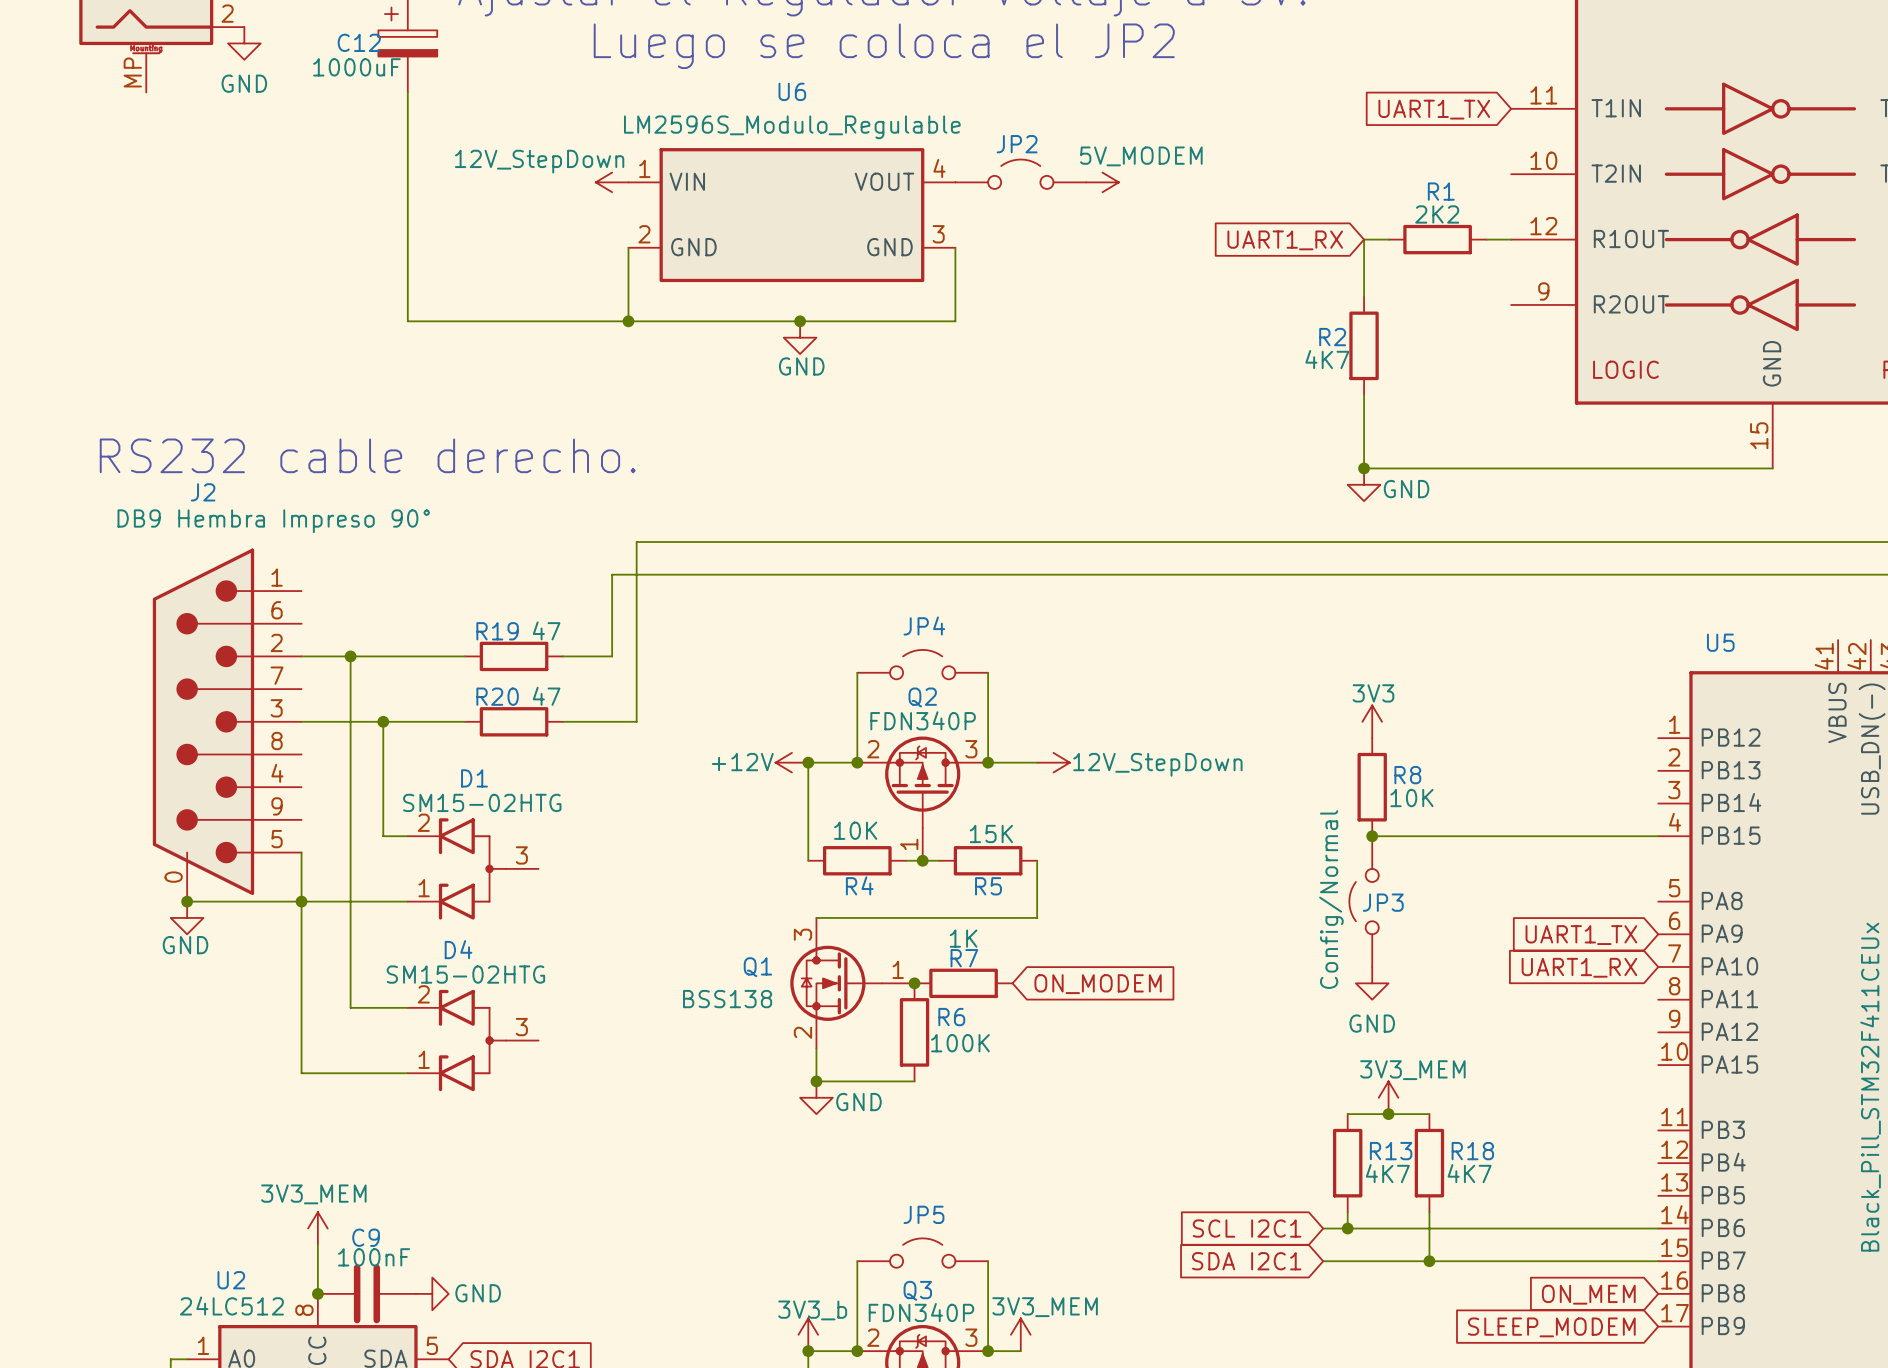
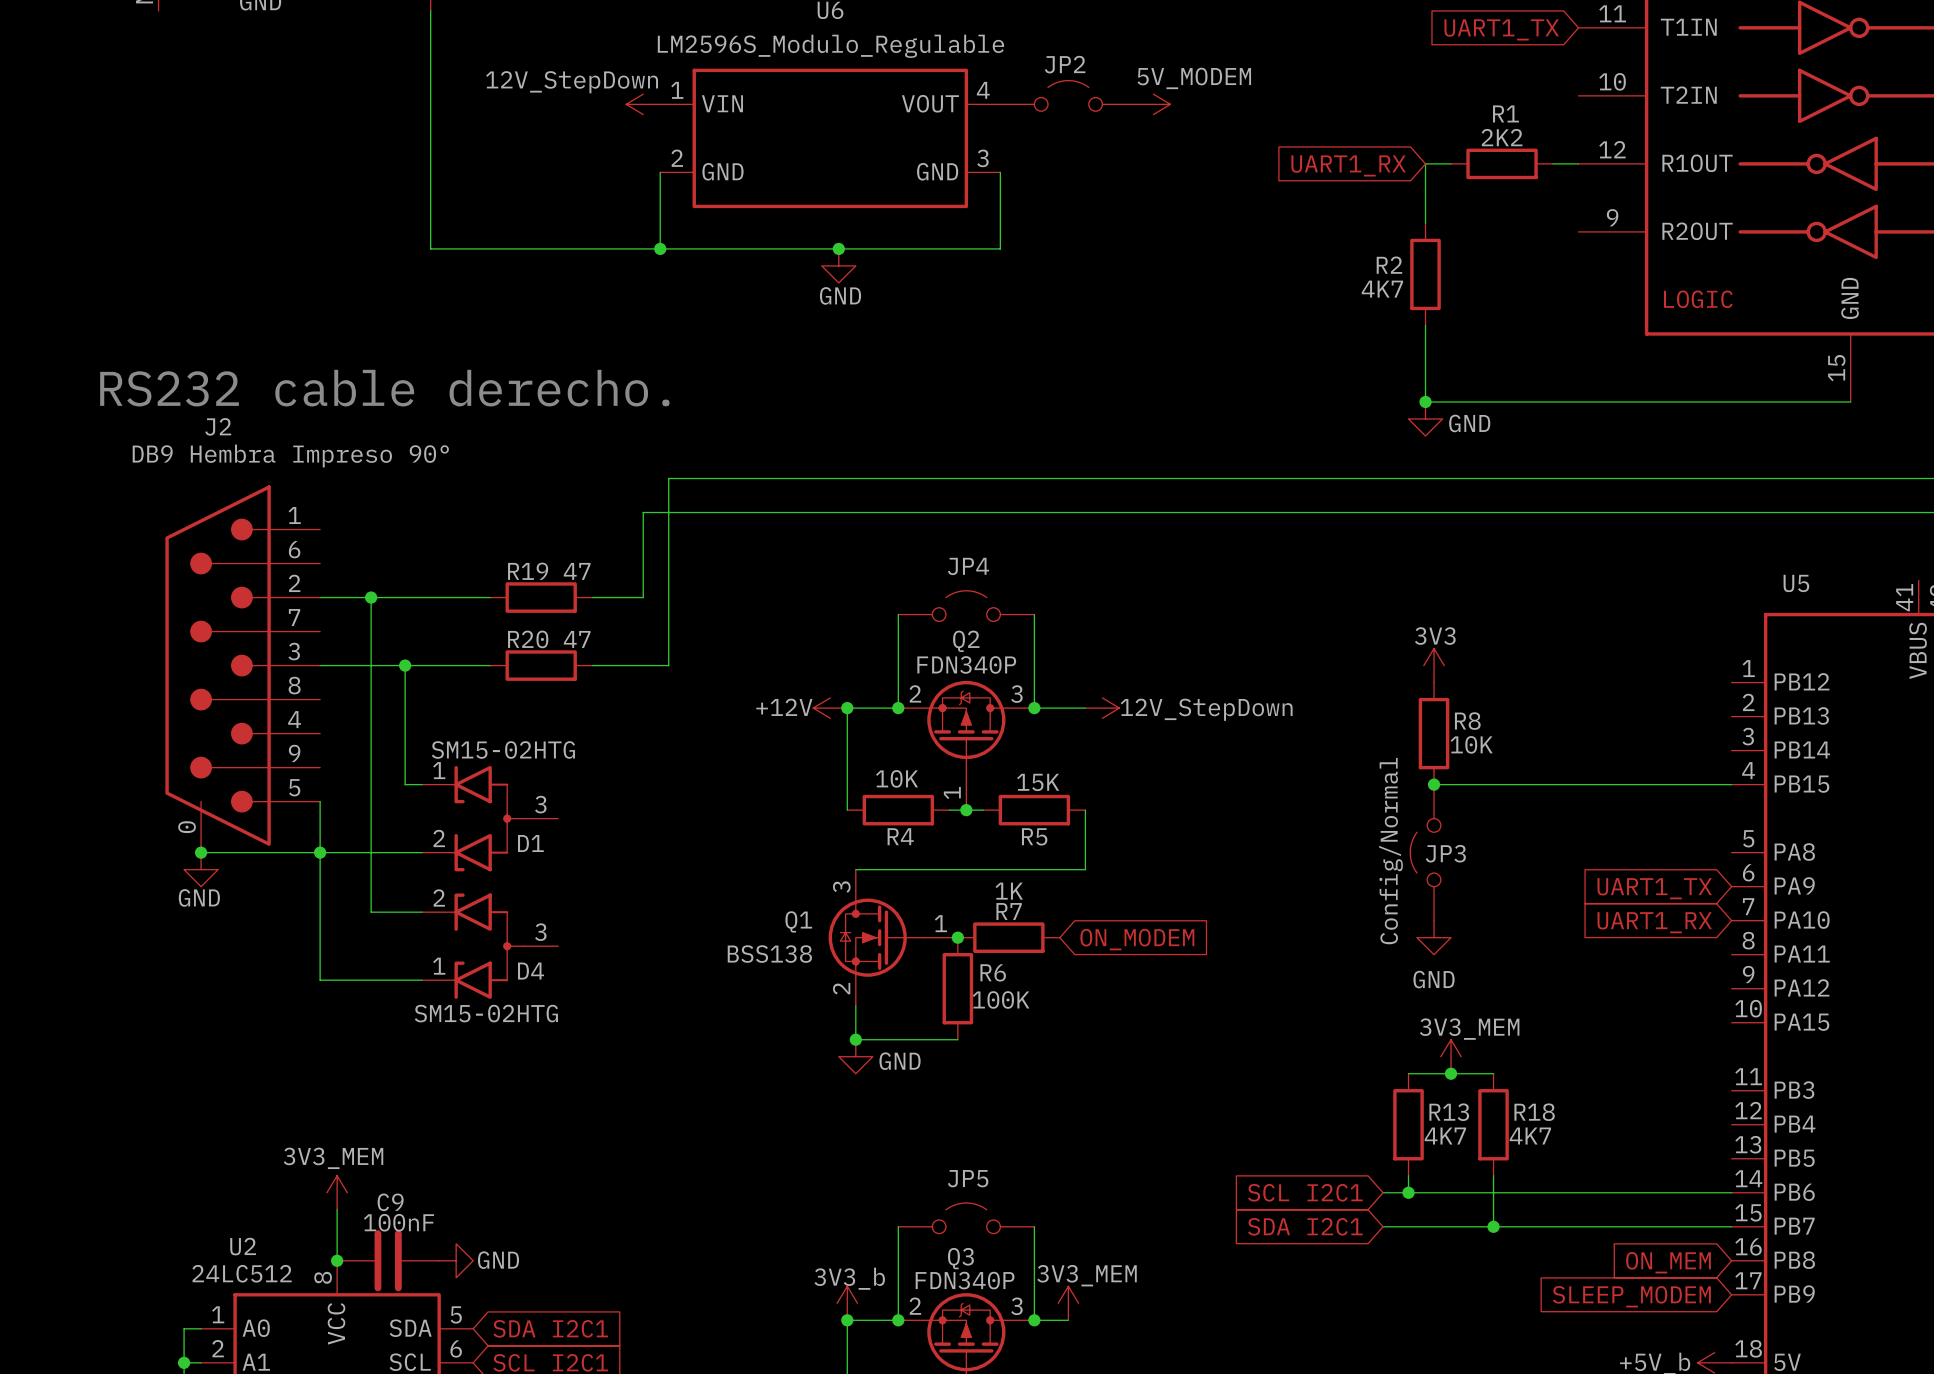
D1 name position: D1 (474, 778) -> D1 (530, 843)
D1 flip: as is (472, 868) -> up-down (489, 818)
D4 name position: D4 (458, 949) -> D4 (531, 971)
wire: (350, 958) (350, 1007) (407, 1007) -> (371, 912) (422, 912)
D4 value position: SM15-02HTG (465, 974) -> SM15-02HTG (486, 1013)
wire: (301, 1024) (301, 1073) (407, 1073) -> (320, 980) (422, 980)
D4 position: (473, 1040) -> (490, 946)

